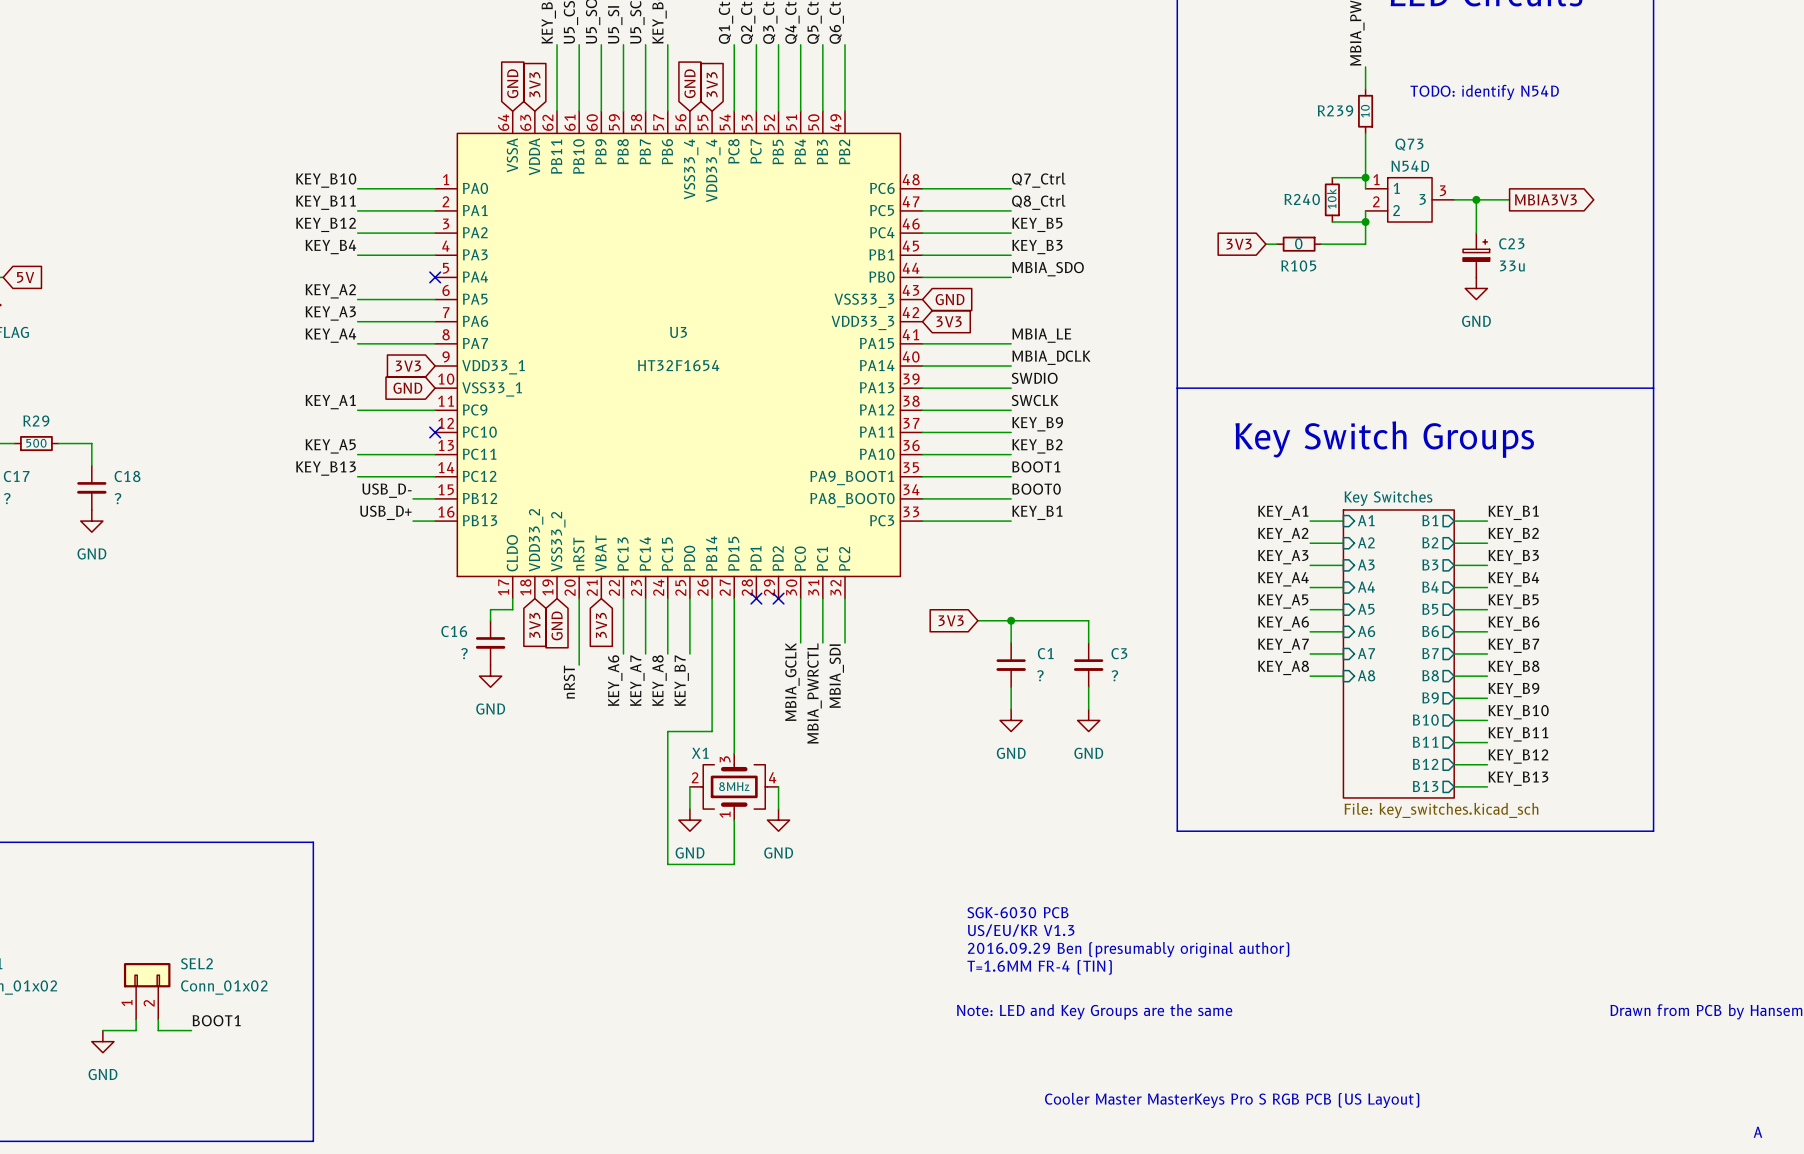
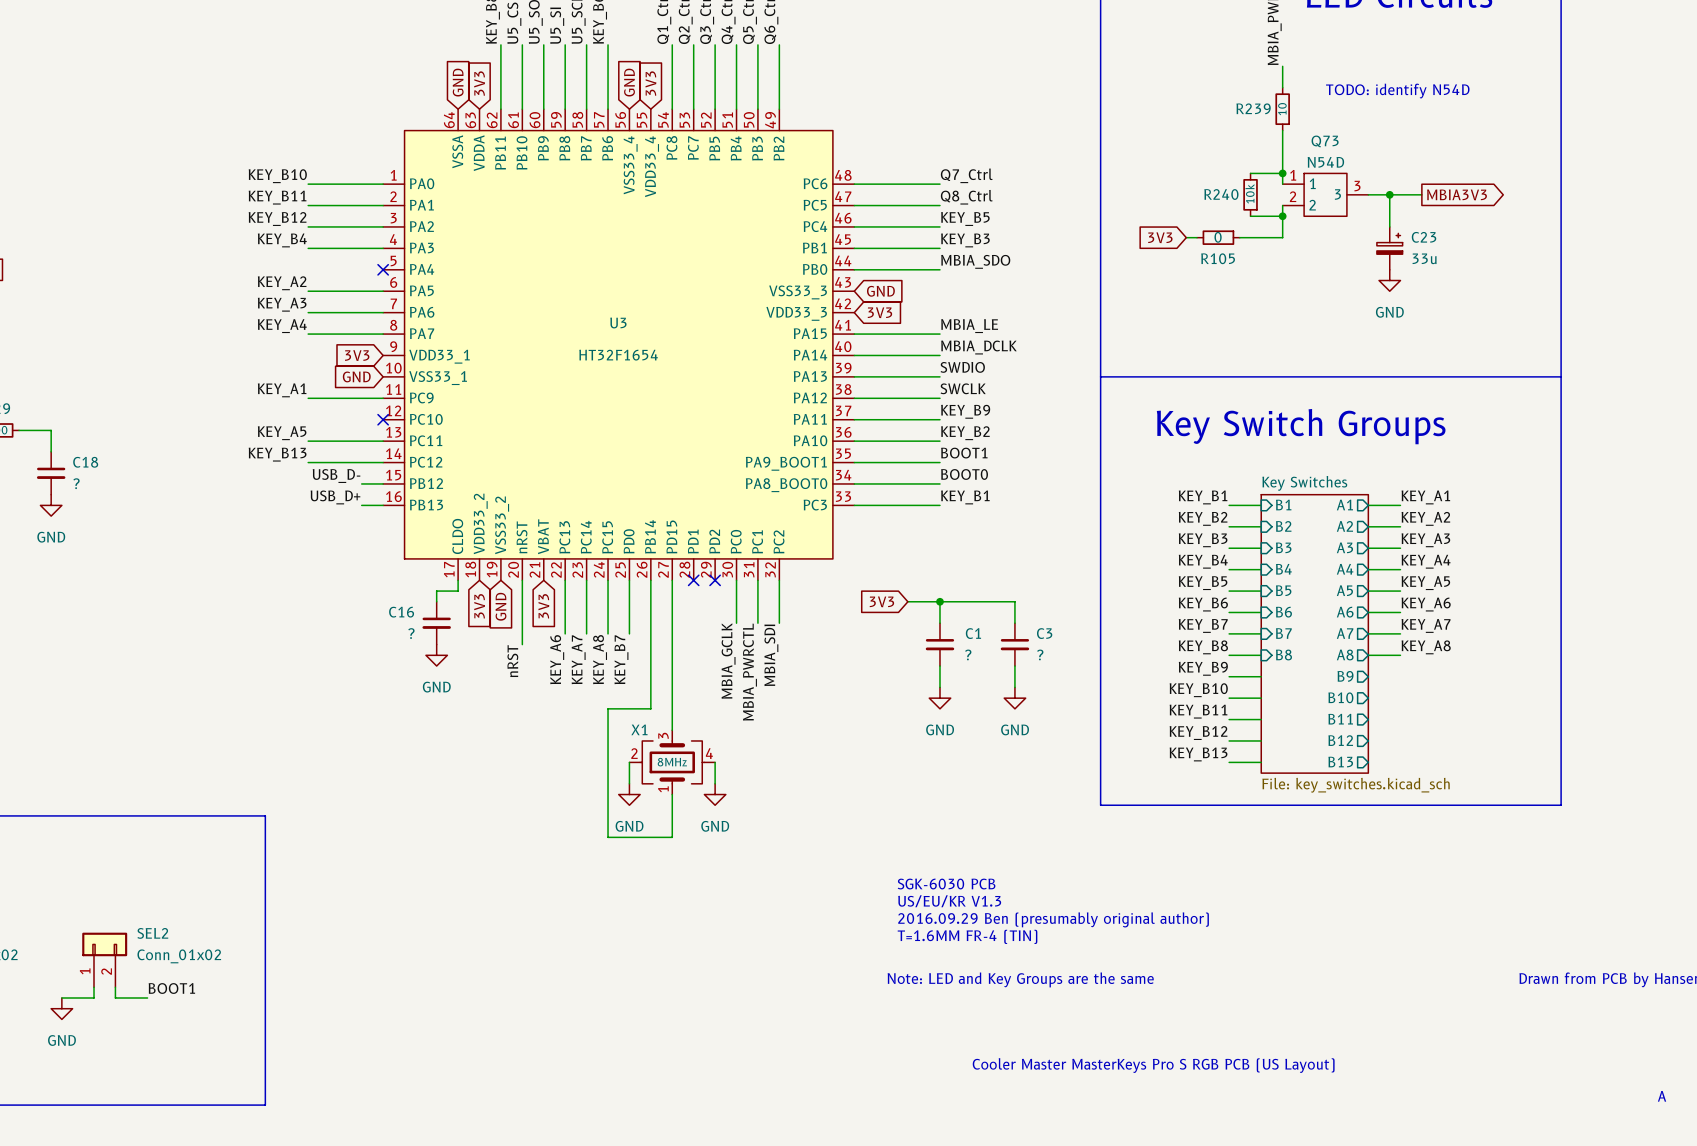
label: KEY_A1 (1283, 512) -> KEY_B1 (1203, 497)
label: KEY_B1 (1513, 512) -> KEY_A1 (1425, 497)
sheet pin: A1 (1366, 520) -> B1 (1283, 504)
sheet pin: B1 (1430, 520) -> A1 (1344, 504)
label: KEY_A2 (1283, 535) -> KEY_B2 (1203, 518)
label: KEY_B2 (1513, 535) -> KEY_A2 (1425, 518)
sheet pin: A2 (1366, 542) -> B2 (1283, 526)
sheet pin: B2 (1430, 542) -> A2 (1344, 526)
label: KEY_A3 (1283, 557) -> KEY_B3 (1203, 540)
label: KEY_B3 (1513, 557) -> KEY_A3 (1425, 540)
sheet pin: A3 (1366, 564) -> B3 (1283, 547)
sheet pin: B3 (1430, 565) -> A3 (1344, 547)
label: KEY_A4 (1283, 579) -> KEY_B4 (1203, 561)
label: KEY_B4 (1513, 579) -> KEY_A4 (1426, 561)
sheet pin: A4 (1366, 587) -> B4 (1283, 569)
sheet pin: B4 (1430, 587) -> A4 (1345, 569)
label: KEY_A5 (1283, 601) -> KEY_B5 (1203, 583)
label: KEY_B5 (1513, 601) -> KEY_A5 (1425, 583)
sheet pin: A5 (1366, 609) -> B5 (1283, 590)
sheet pin: B5 (1430, 609) -> A5 (1344, 590)
label: KEY_A6 (1283, 623) -> KEY_B6 (1203, 604)
label: KEY_B6 (1513, 623) -> KEY_A6 (1426, 604)
sheet pin: A6 (1366, 631) -> B6 (1283, 612)
sheet pin: B6 (1430, 631) -> A6 (1345, 612)
label: KEY_A7 (1283, 645) -> KEY_B7 (1203, 625)
label: KEY_B7 (1513, 645) -> KEY_A7 (1426, 625)
sheet pin: A7 (1366, 653) -> B7 (1283, 633)
sheet pin: B7 (1430, 653) -> A7 (1345, 633)
label: KEY_A8 (1283, 667) -> KEY_B8 (1203, 647)
label: KEY_B8 (1513, 667) -> KEY_A8 (1426, 647)
sheet pin: A8 (1366, 675) -> B8 (1283, 654)
sheet pin: B8 (1430, 675) -> A8 (1345, 654)
label position: KEY_B9 (1513, 690) -> KEY_B9 (1203, 668)
wire: (1454, 698) (1487, 698) -> (1229, 676) (1261, 676)
label position: KEY_B10 (1518, 712) -> KEY_B10 (1198, 690)
wire: (1454, 720) (1487, 720) -> (1229, 698) (1261, 698)
label position: KEY_B11 (1518, 734) -> KEY_B11 (1198, 711)
wire: (1454, 742) (1487, 742) -> (1229, 719) (1261, 719)
label position: KEY_B12 (1518, 756) -> KEY_B12 (1198, 733)
wire: (1454, 764) (1487, 764) -> (1229, 740) (1261, 740)
label position: KEY_B13 (1518, 778) -> KEY_B13 (1198, 754)
wire: (1454, 786) (1487, 786) -> (1229, 762) (1261, 762)

